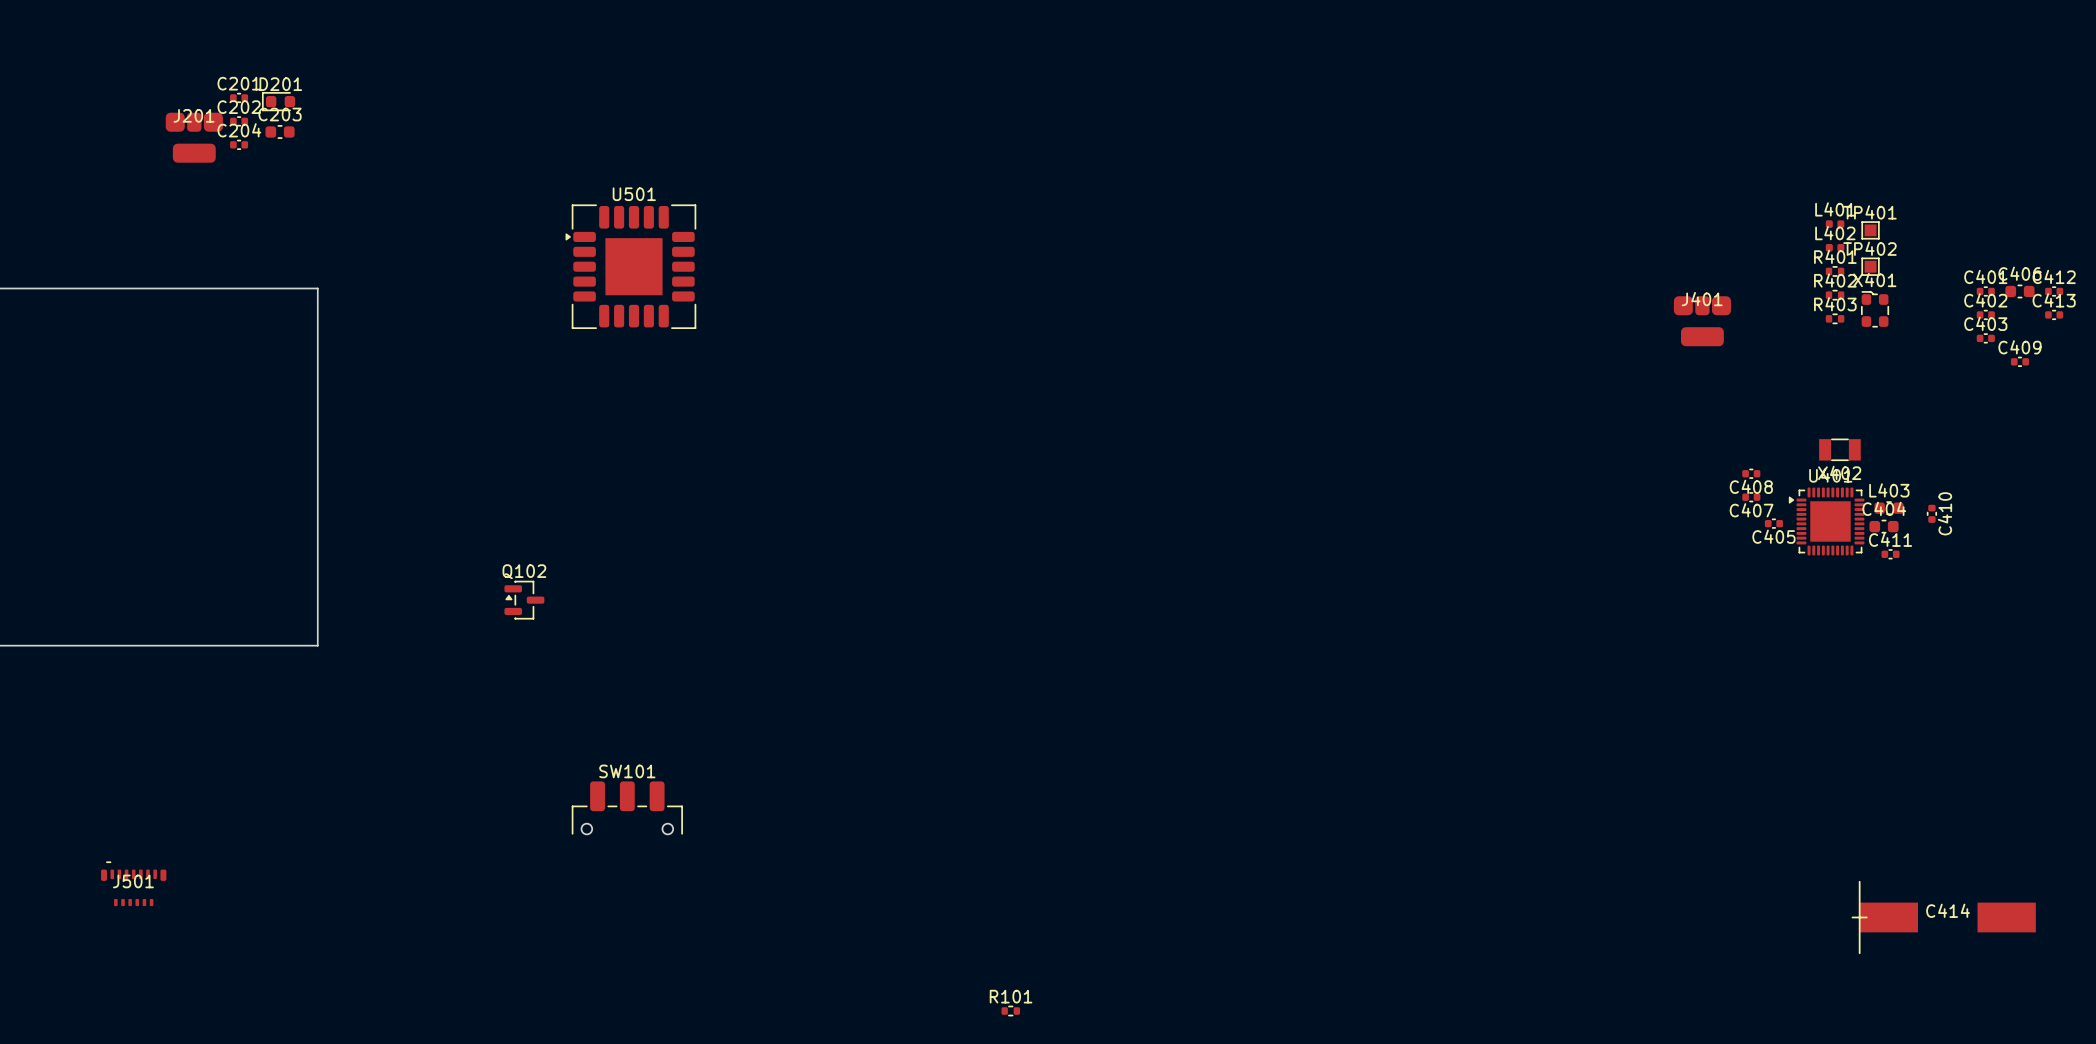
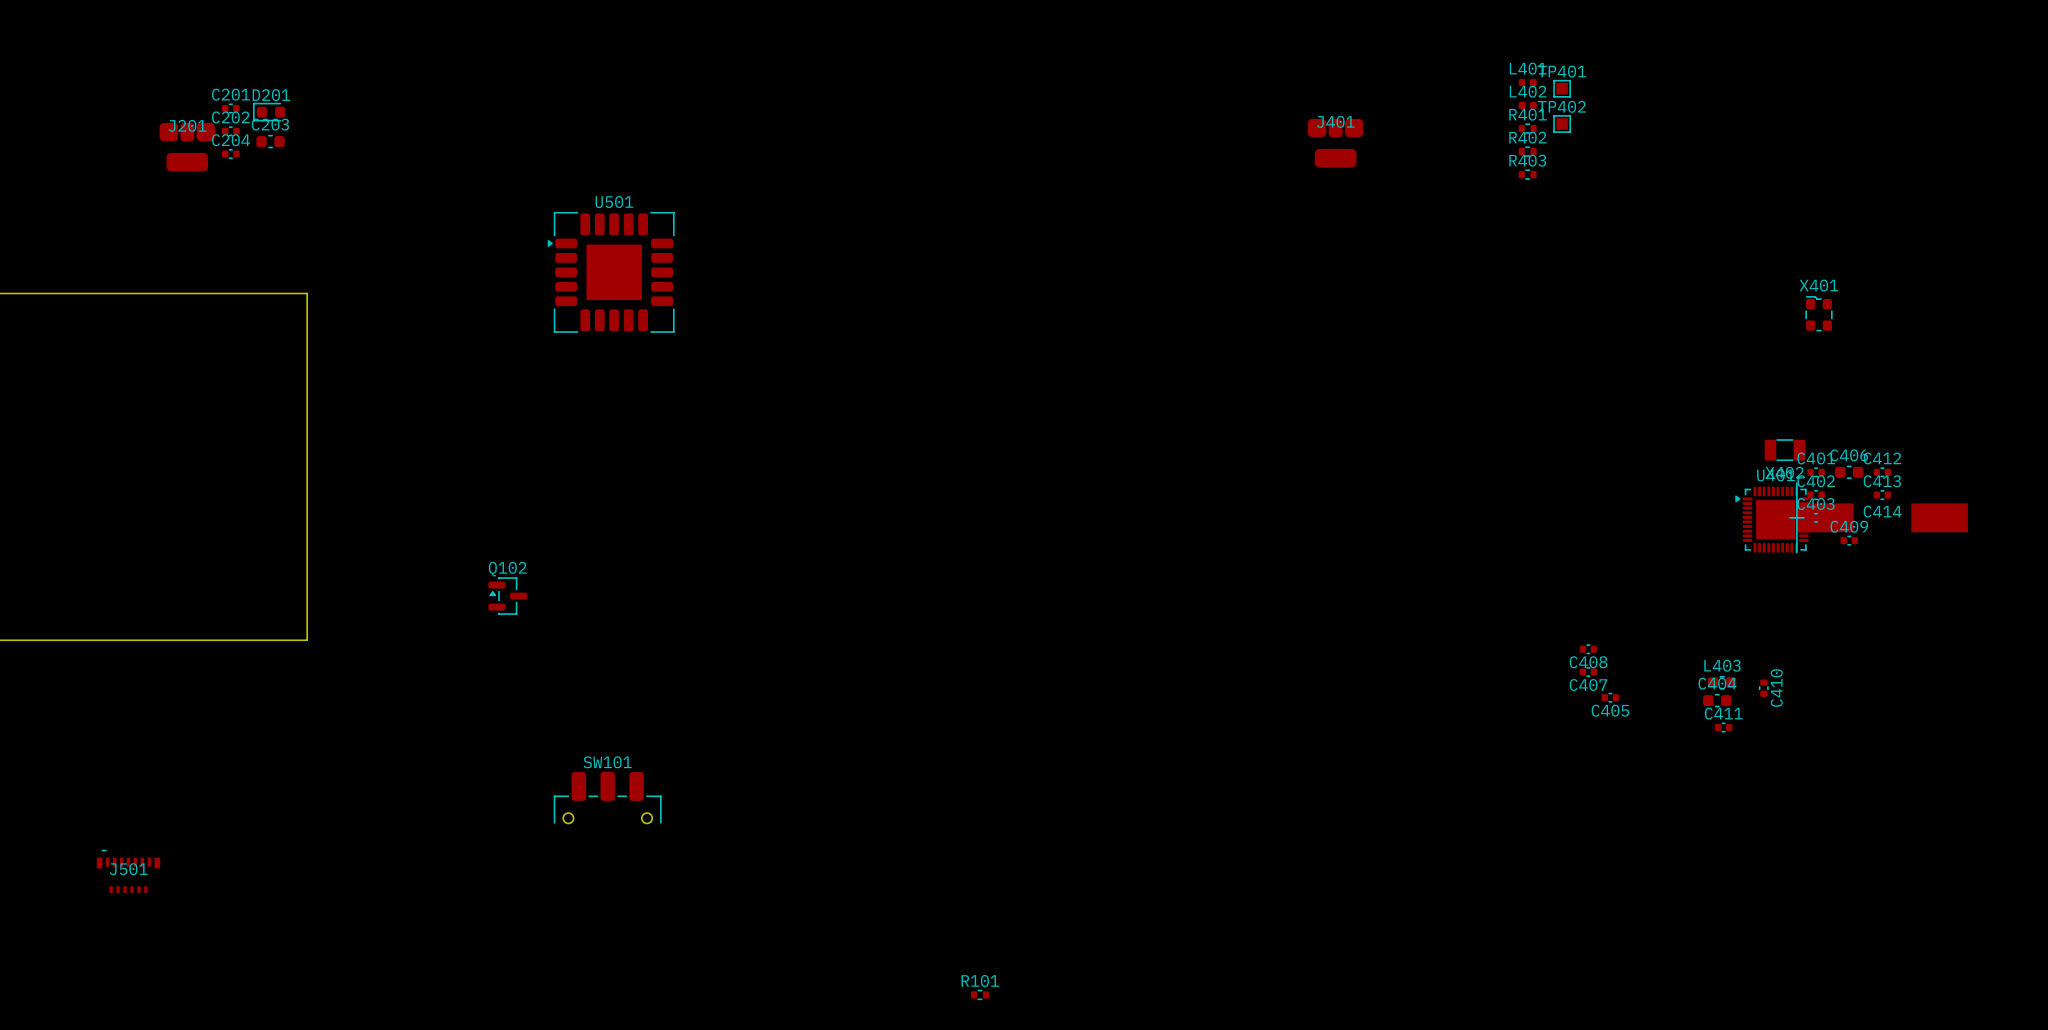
L401 position: (1835, 224) -> (1527, 82)
TP401 position: (1870, 230) -> (1562, 88)
L402 position: (1835, 247) -> (1527, 105)
TP402 position: (1870, 266) -> (1562, 124)
R401 position: (1835, 271) -> (1527, 128)
C401 position: (1985, 291) -> (1816, 472)
C406 position: (2019, 291) -> (1849, 472)
C412 position: (2054, 291) -> (1882, 472)
R402 position: (1835, 295) -> (1527, 151)
C402 position: (1985, 314) -> (1816, 495)
C413 position: (2054, 314) -> (1882, 495)
R403 position: (1835, 318) -> (1527, 174)
J401 position: (1702, 321) -> (1335, 143)
C403 position: (1985, 338) -> (1816, 517)
C409 position: (2019, 361) -> (1849, 540)
C408 position: (1751, 473) -> (1588, 649)
C407 position: (1751, 497) -> (1588, 672)
L403 position: (1889, 508) -> (1722, 682)
C410 position: (1931, 513) -> (1763, 688)
C405 position: (1773, 523) -> (1610, 697)
C404 position: (1884, 526) -> (1717, 700)
C411 position: (1890, 554) -> (1723, 727)
C414 position: (1943, 917) -> (1878, 517)

